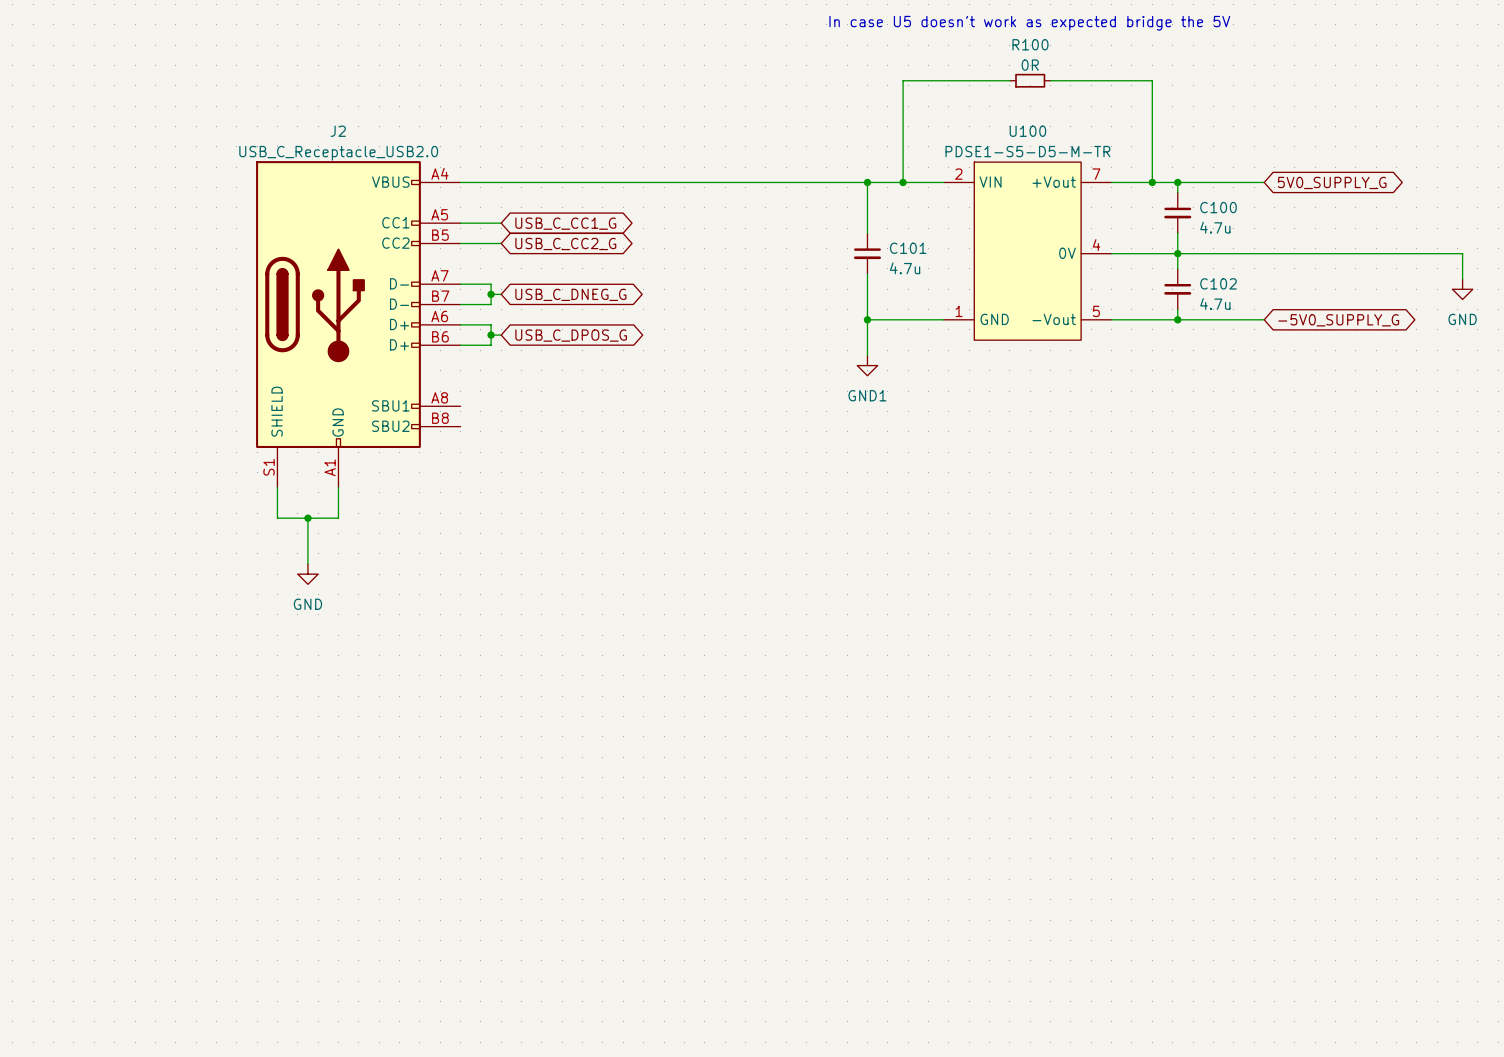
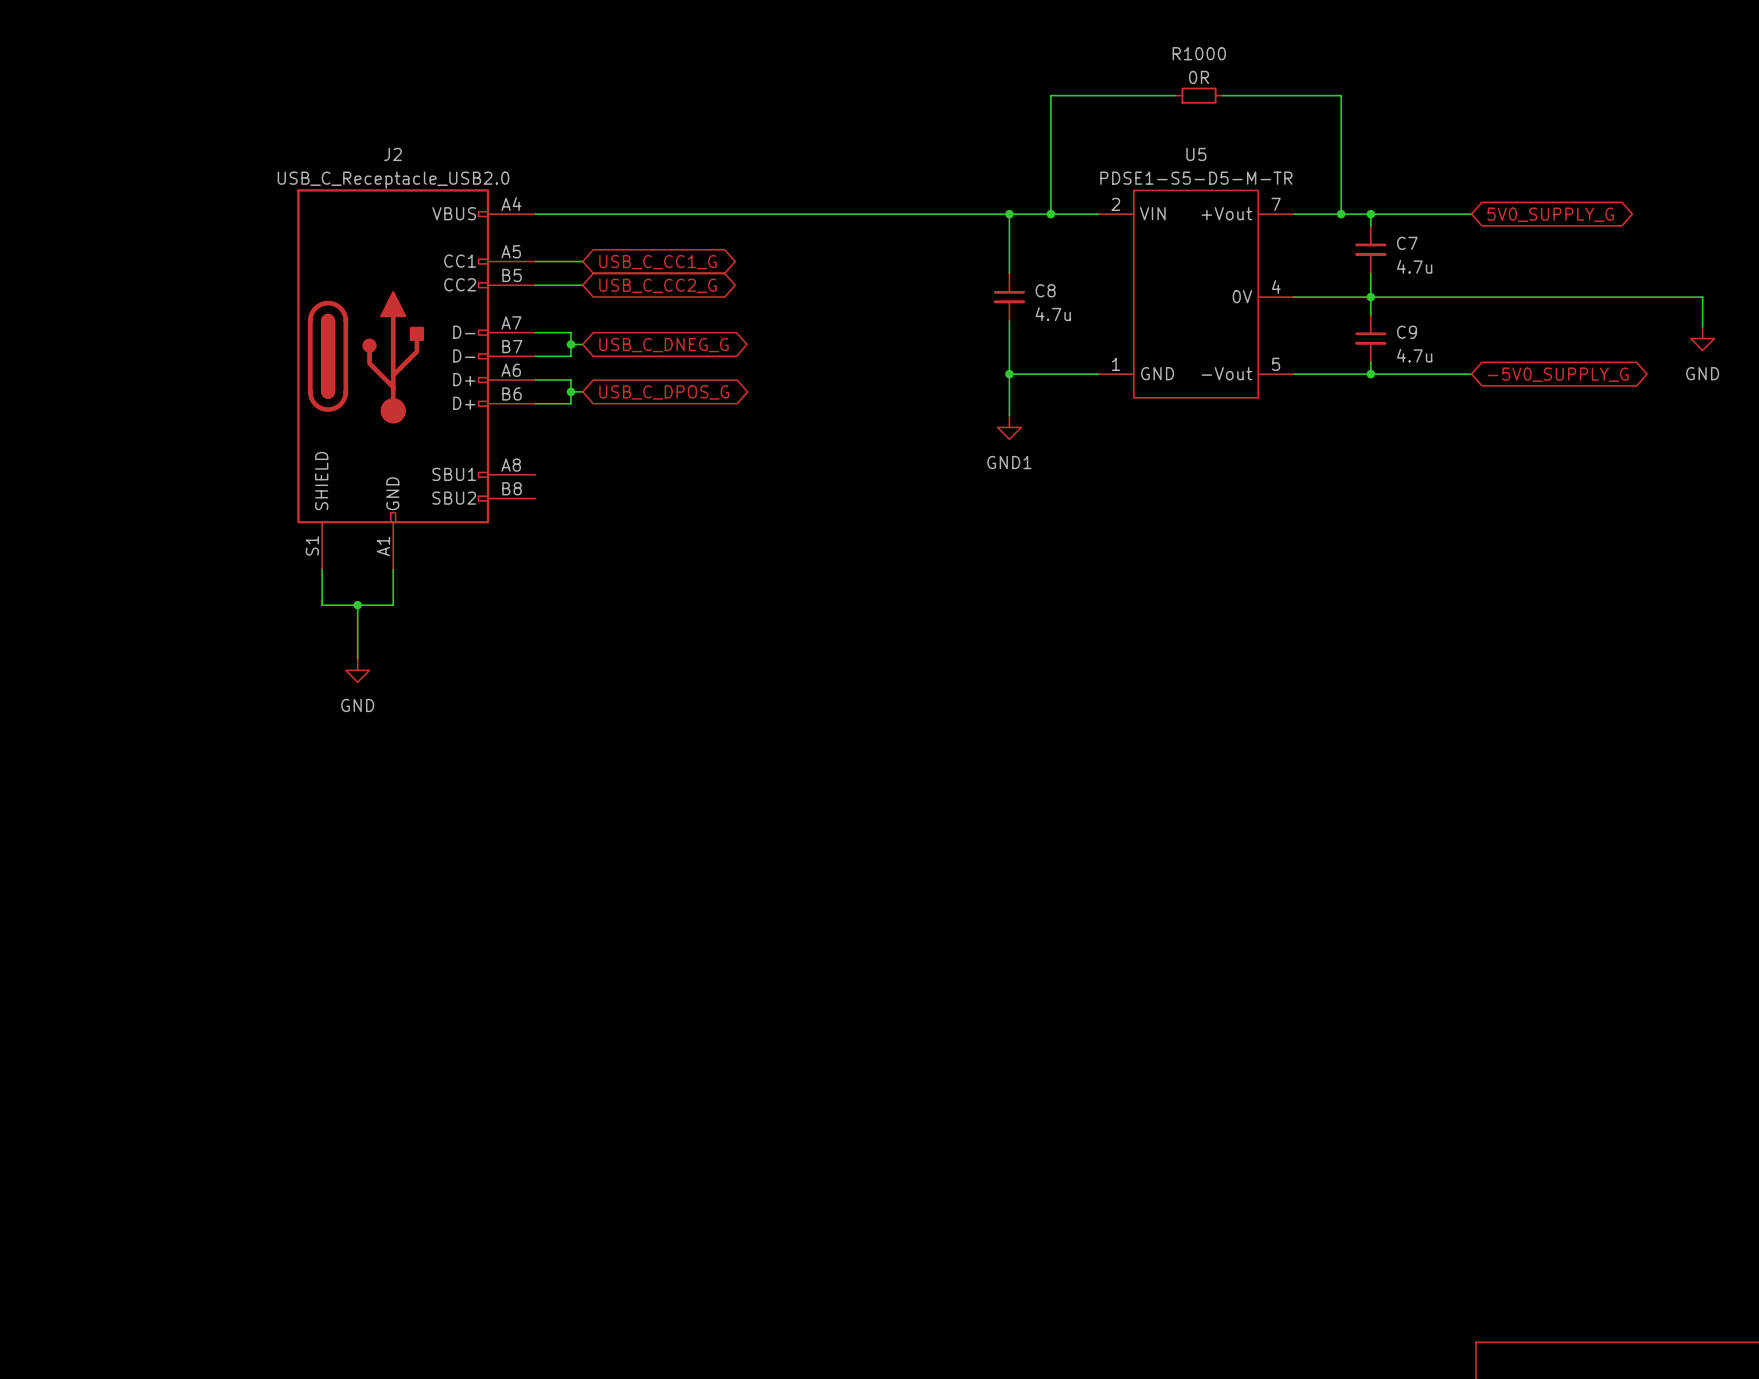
text: In case U5 doesn't work as expected bridge the 5V (1029, 23) -> none
R100 name: R100 (1030, 44) -> R1000 (1199, 53)
U100 name: U100 (1027, 131) -> U5 (1196, 154)
C100 name: C100 (1218, 207) -> C7 (1407, 243)
C101 name: C101 (908, 248) -> C8 (1045, 290)
C102 name: C102 (1218, 283) -> C9 (1407, 332)

